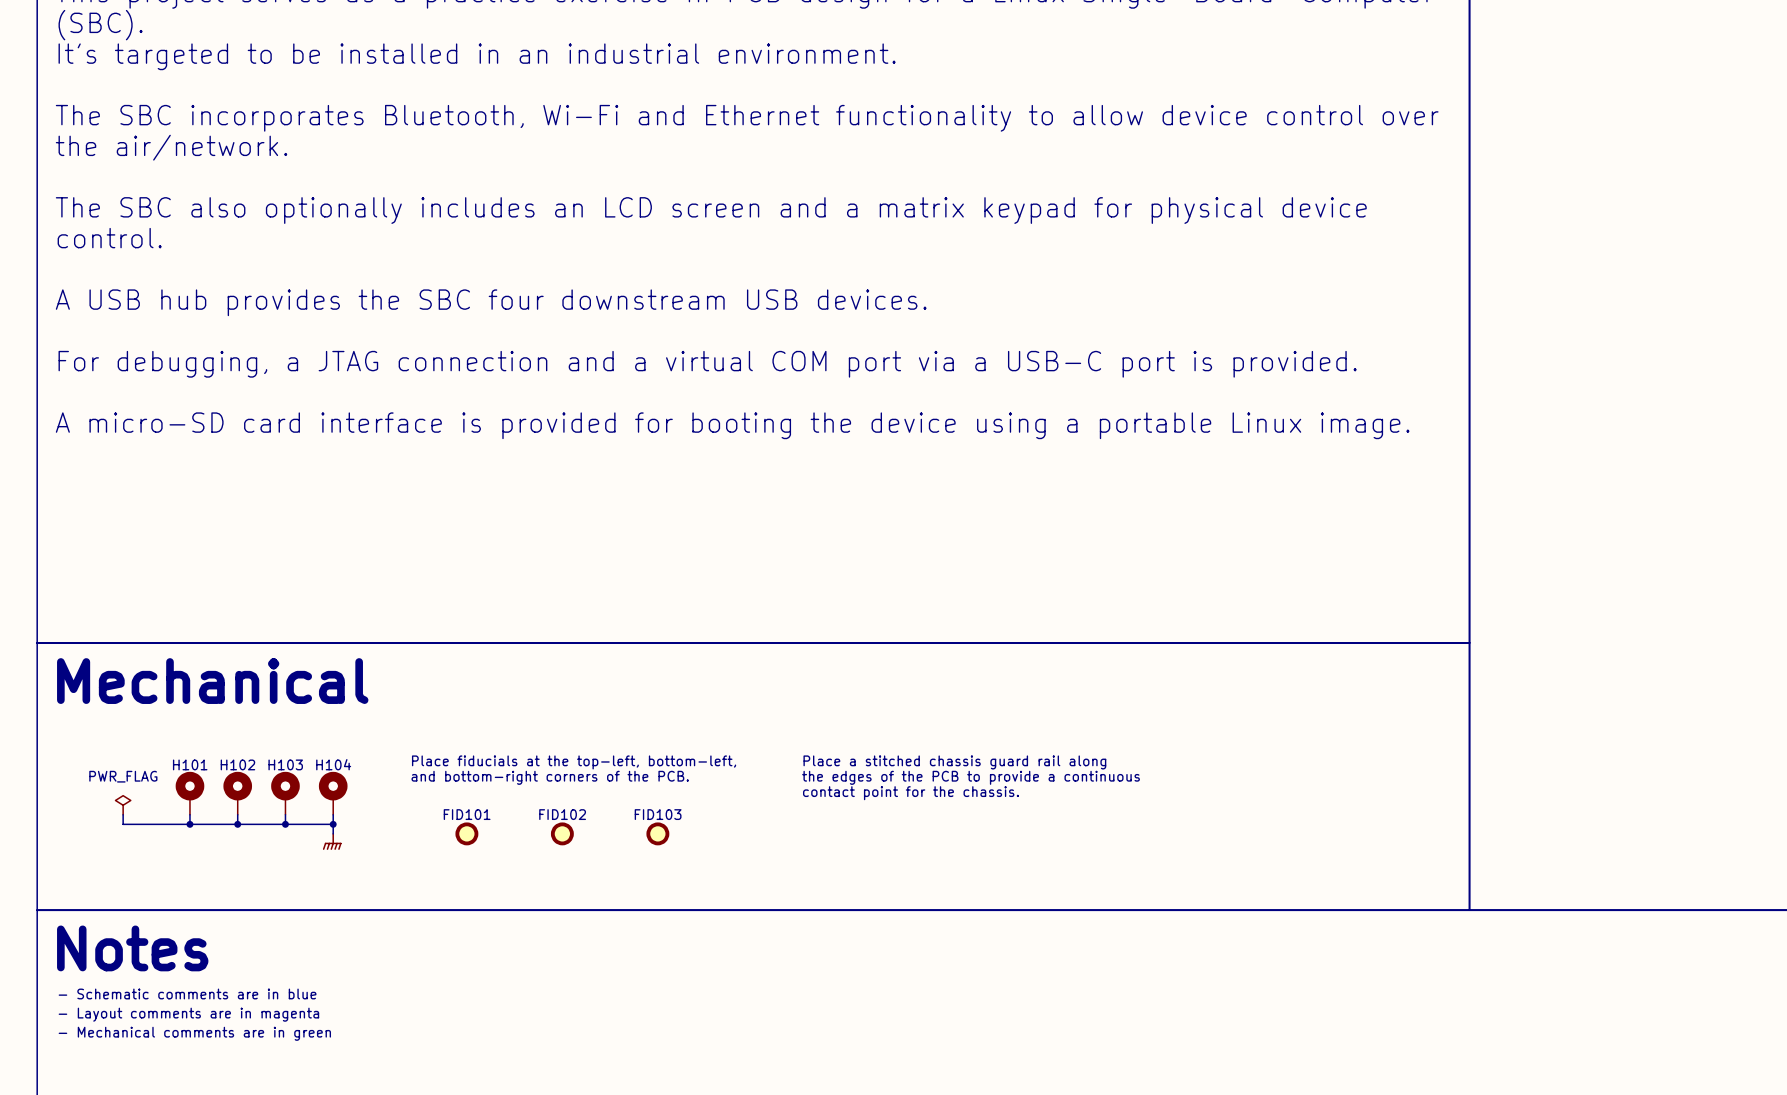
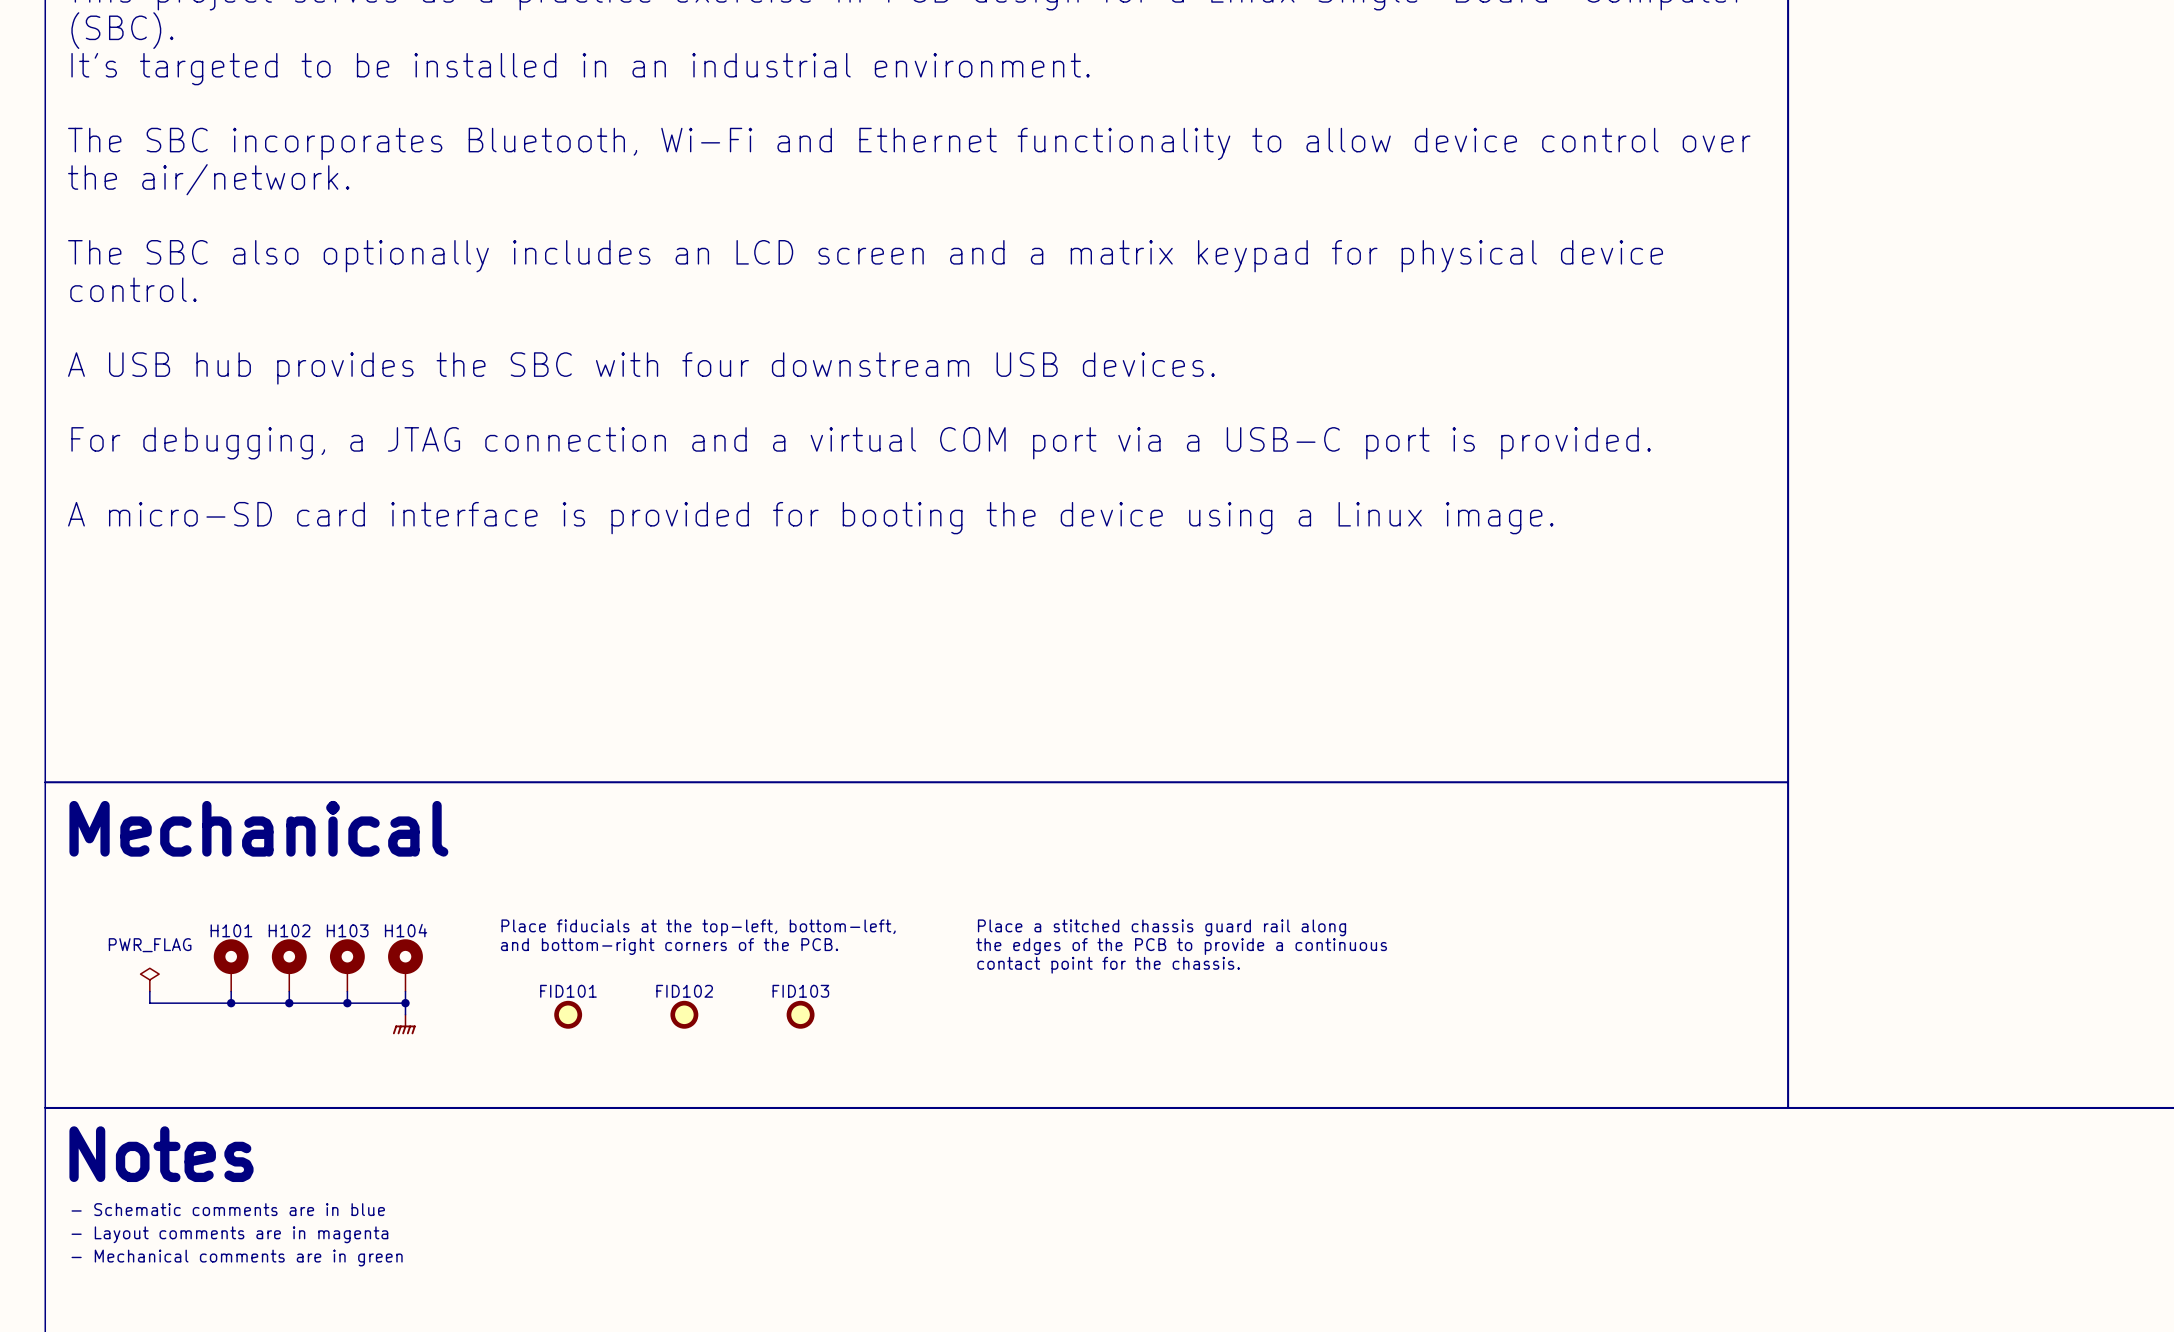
text: A USB hub provides the SBC four downstream USB devices. (491, 302) -> A USB hub provides the SBC with four downstream USB devices. (641, 368)
text: A micro-SD card interface is provided for booting the device using a portable Linux image. (732, 425) -> A micro-SD card interface is provided for booting the device using a Linux image. (810, 518)

